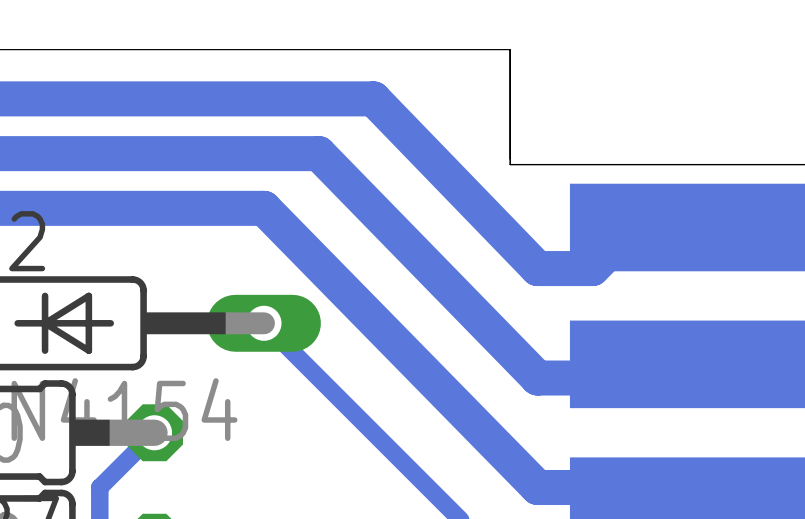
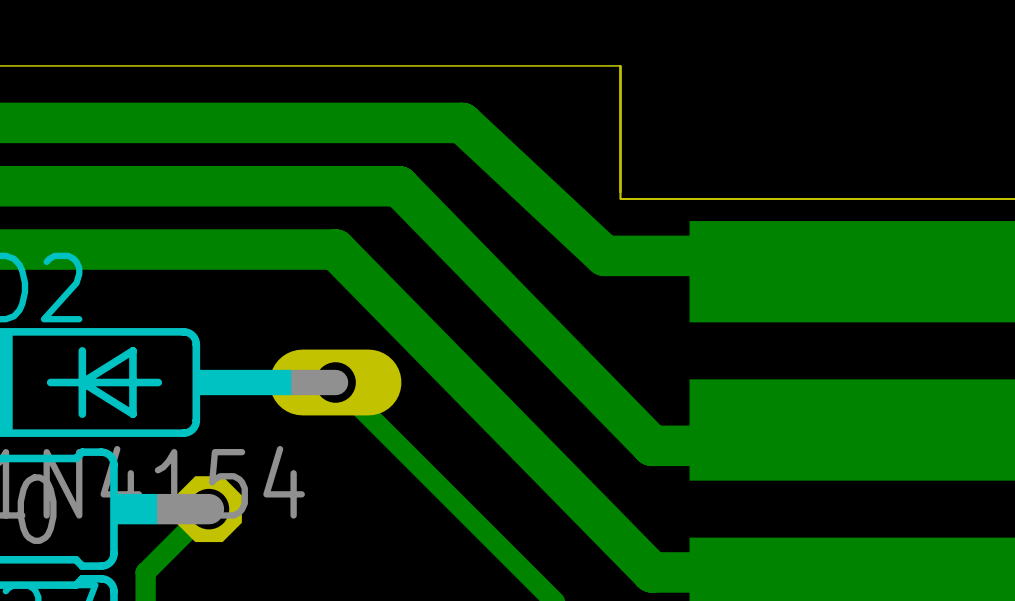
bottom track: (373, 98) (537, 268) (592, 268) (630, 230) -> (462, 122) (604, 255) (715, 255) (759, 275)

